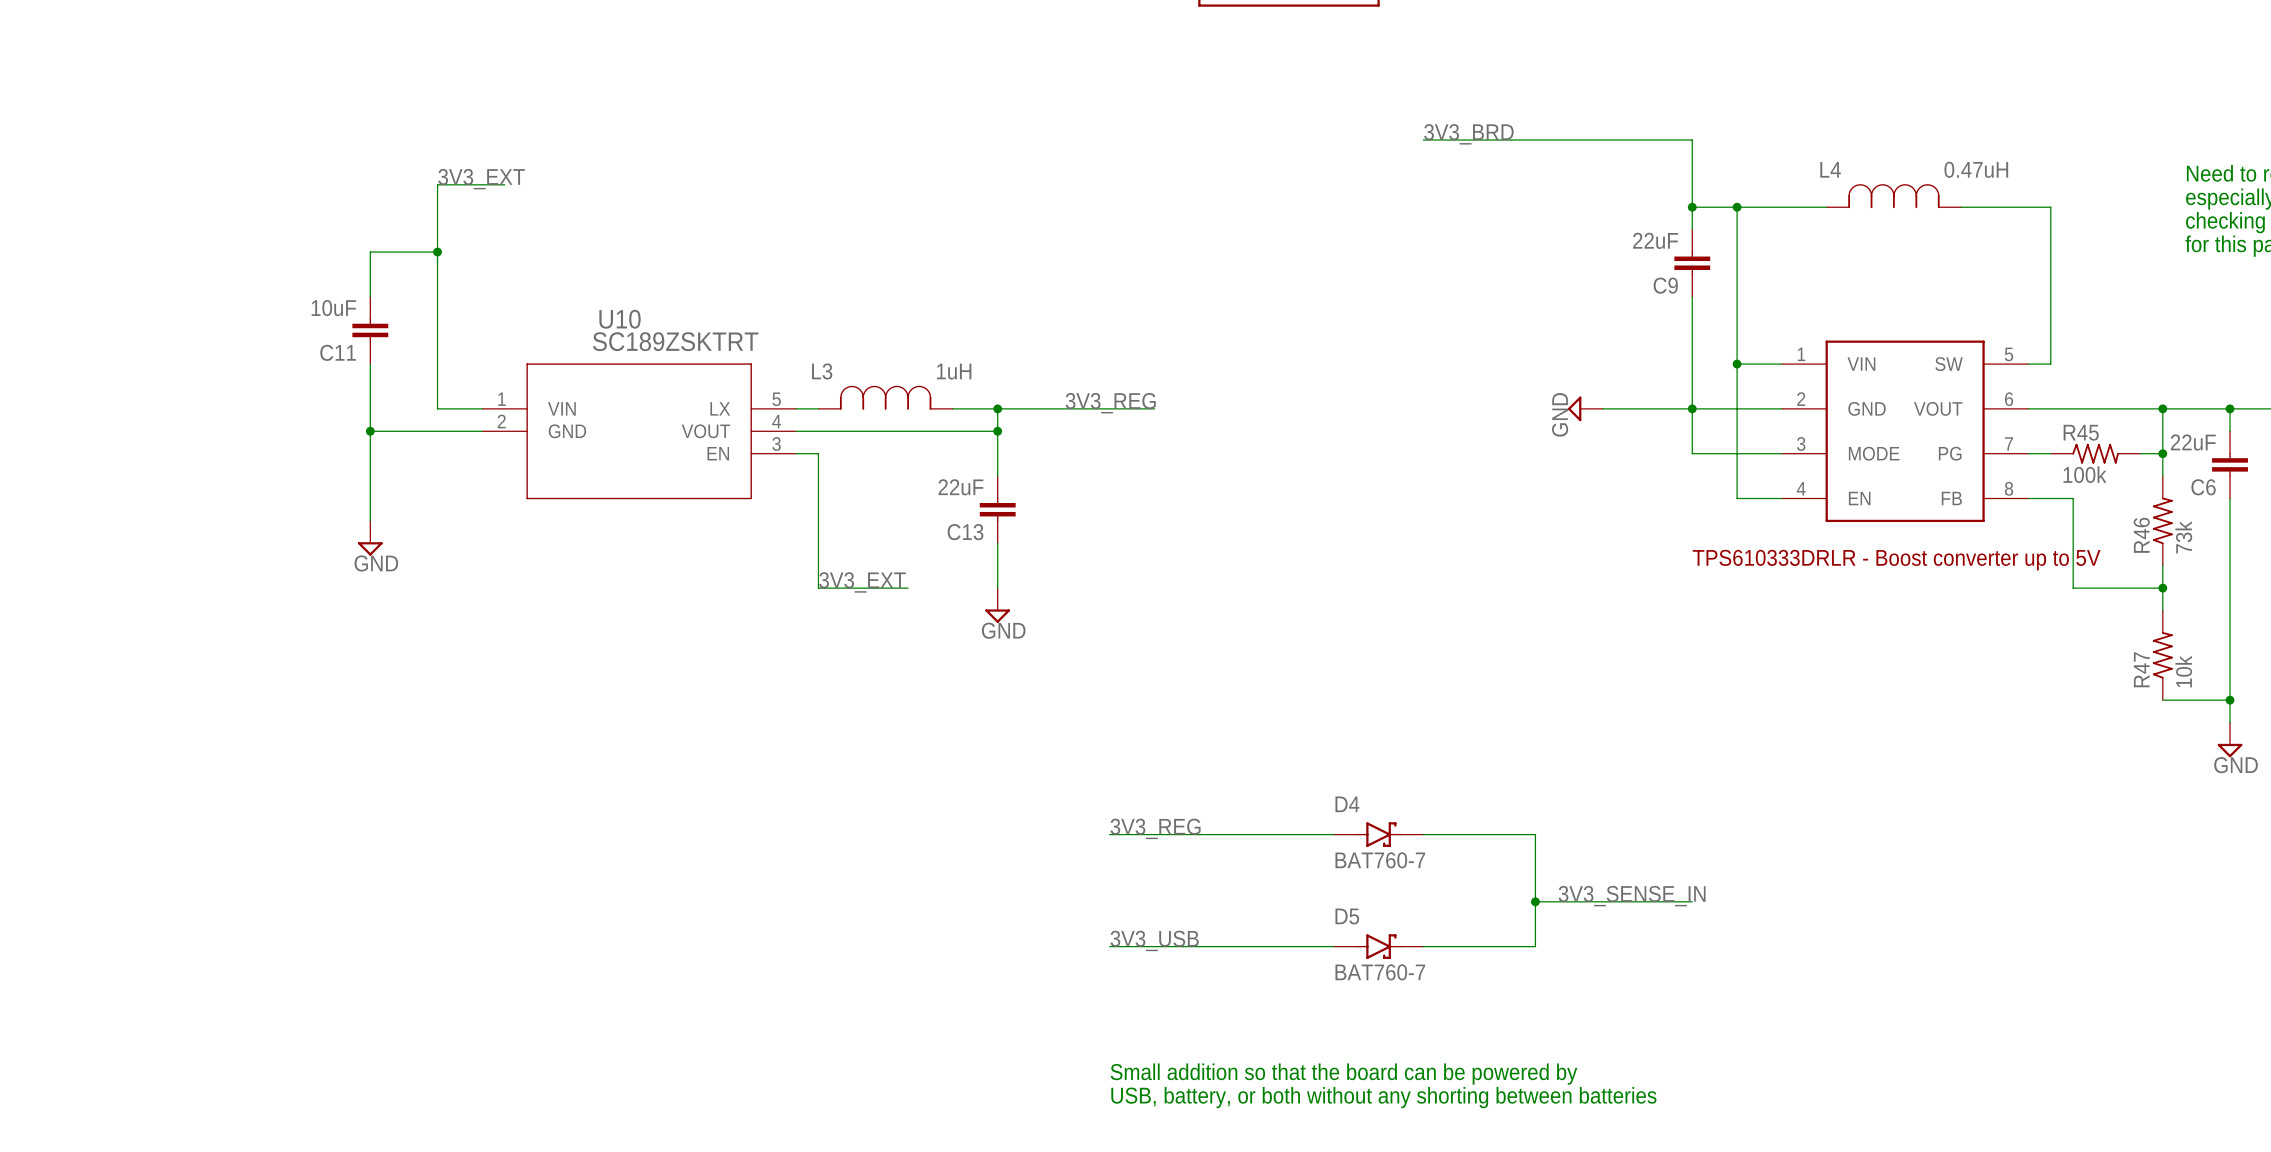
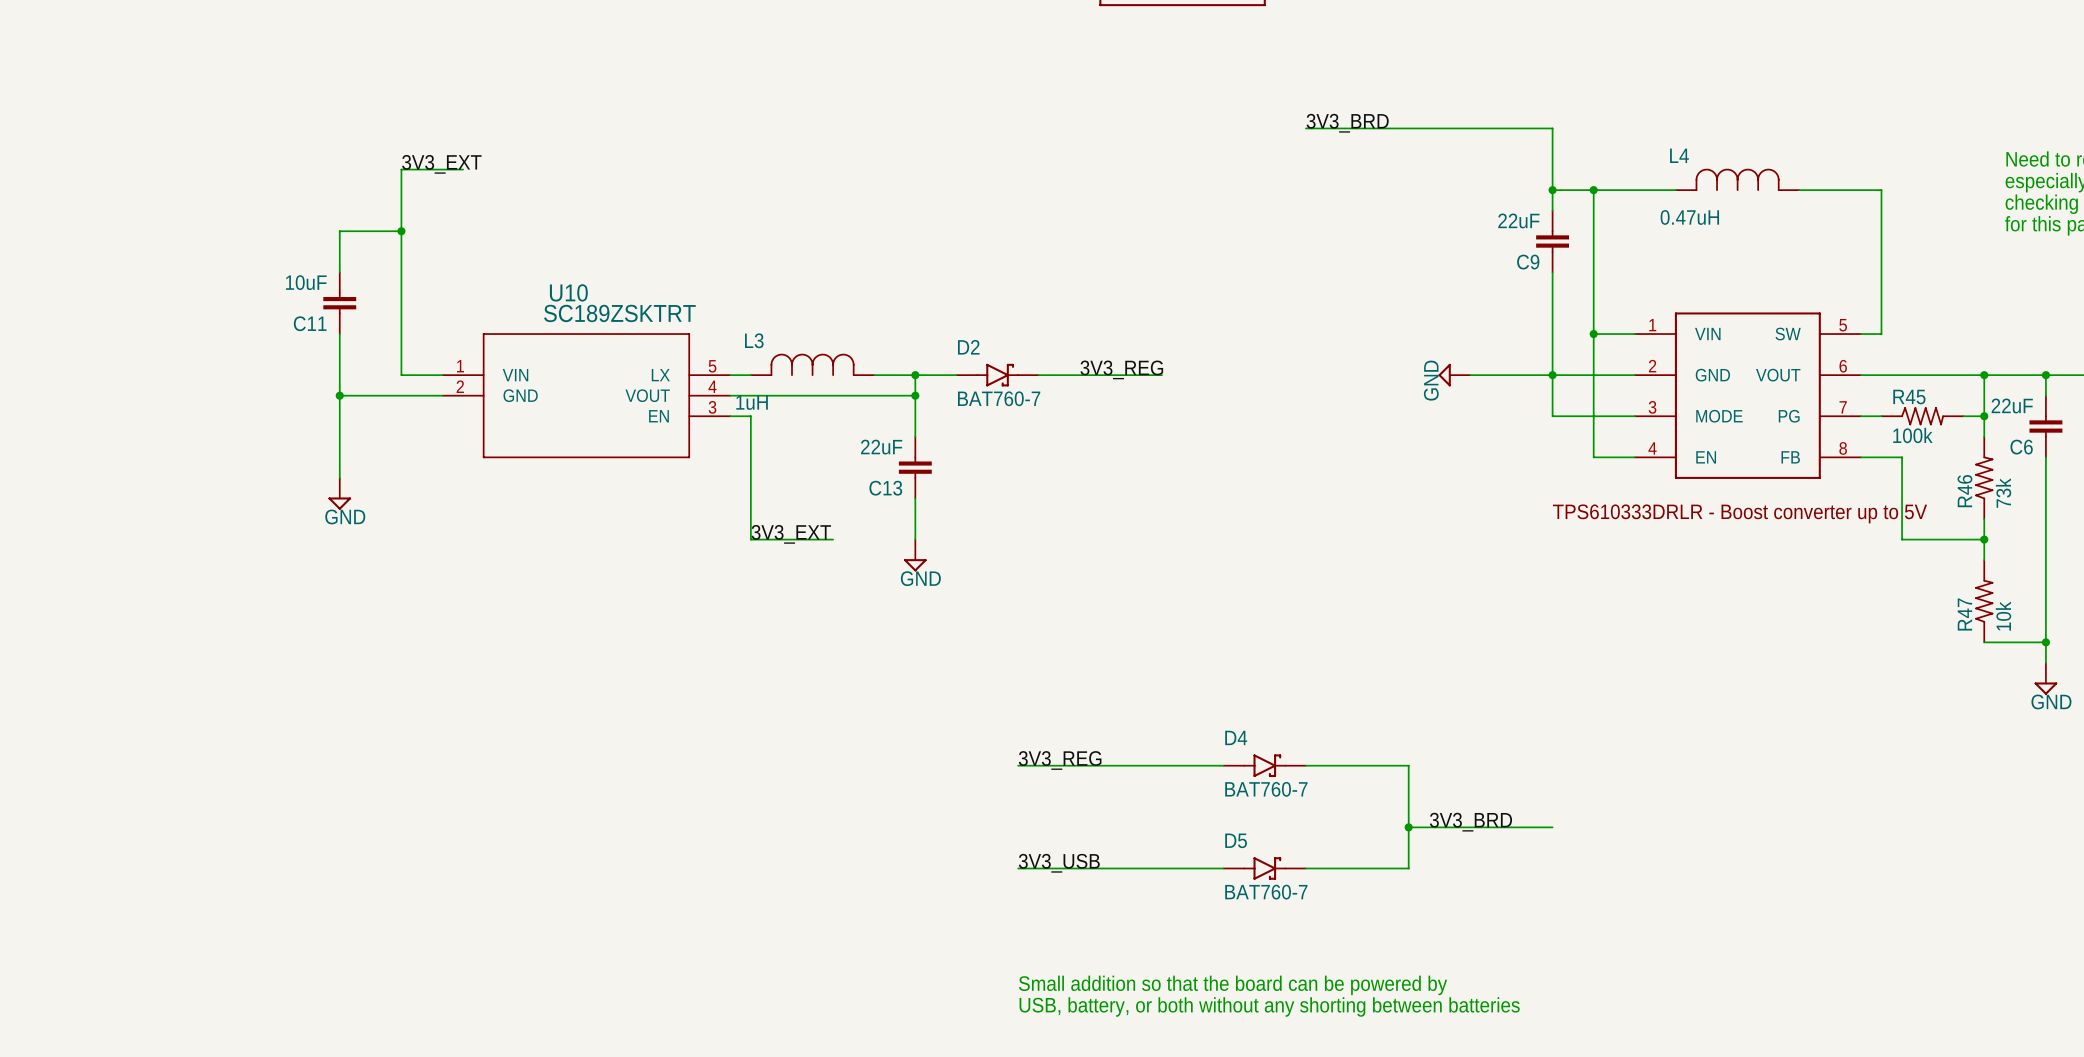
L4 value position: 0.47uH (1976, 169) -> 0.47uH (1689, 217)
L3 value position: 1uH (954, 371) -> 1uH (752, 402)
label position: 3V3_REG (1110, 403) -> 3V3_REG (1121, 369)
D2: none -> BAT760-7 (997, 375)
wire: none -> (1059, 375) (1162, 375)
label: 3V3_SENSE_IN (1632, 896) -> 3V3_BRD (1471, 822)

